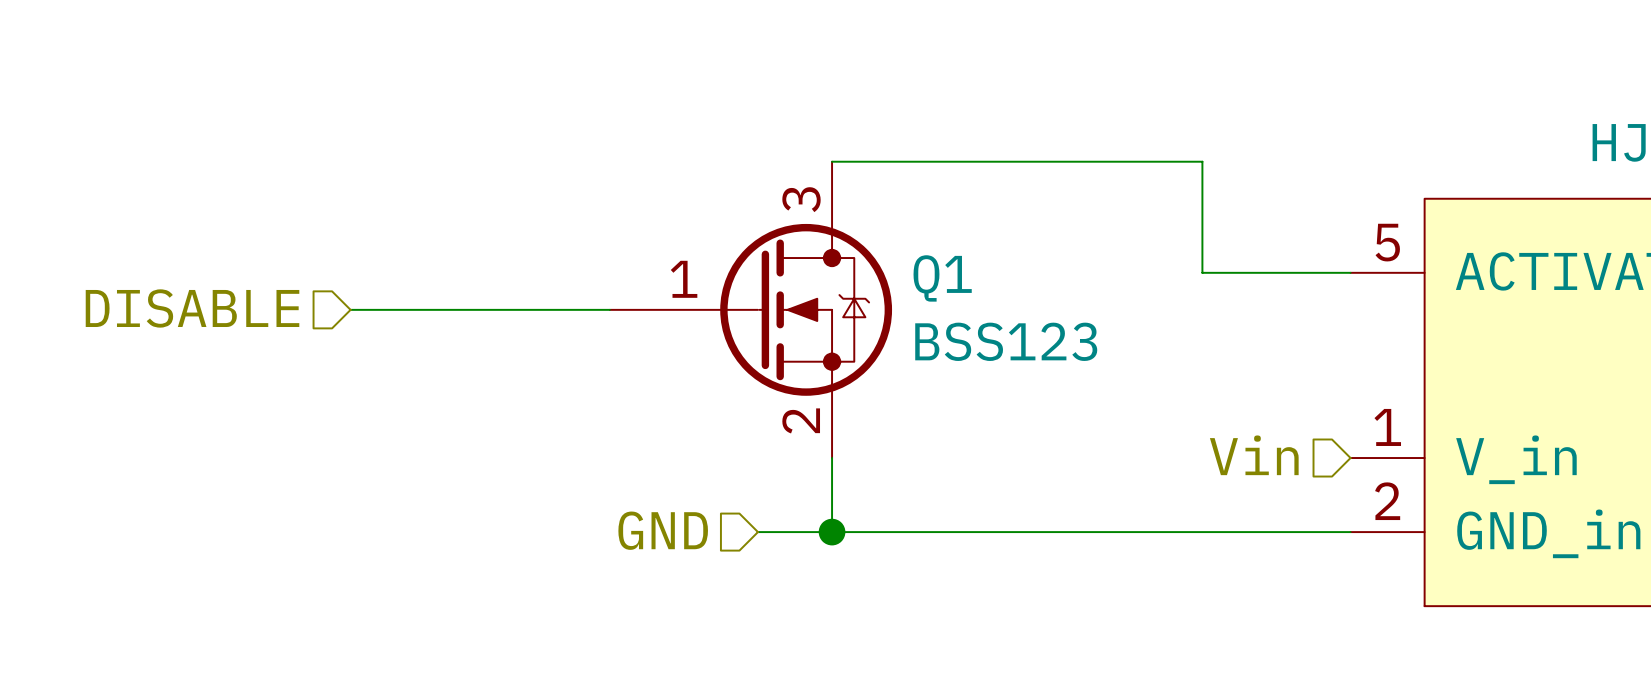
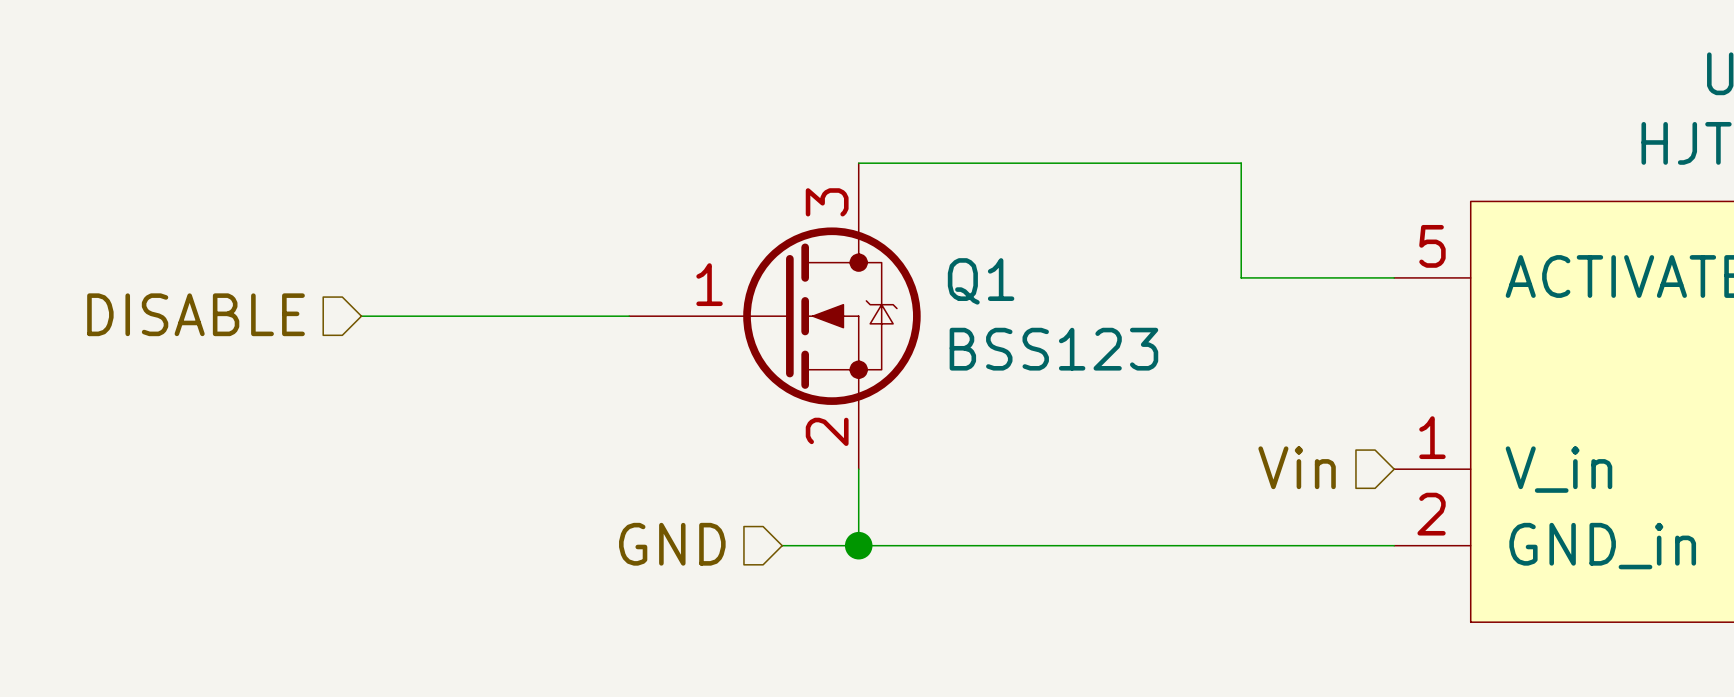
Q1 symbol: [609, 161, 893, 459] -> [629, 163, 921, 470]

